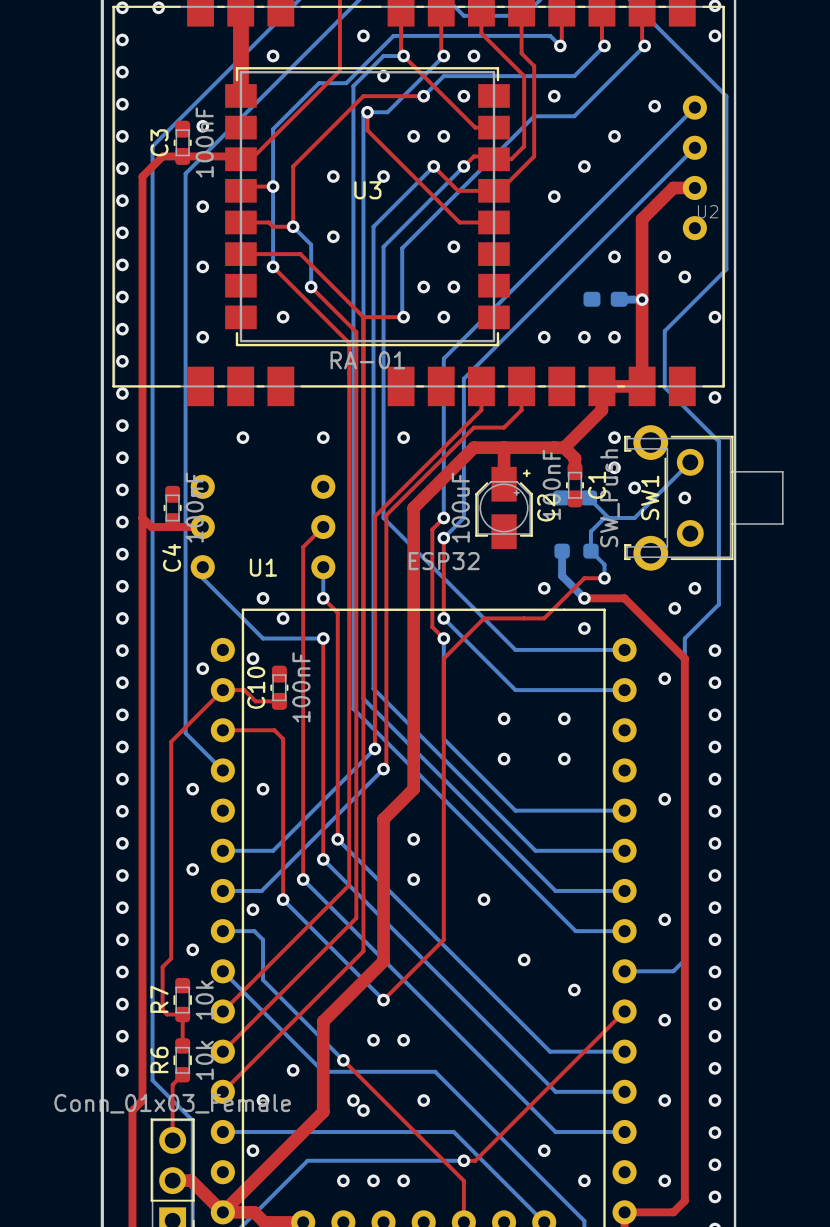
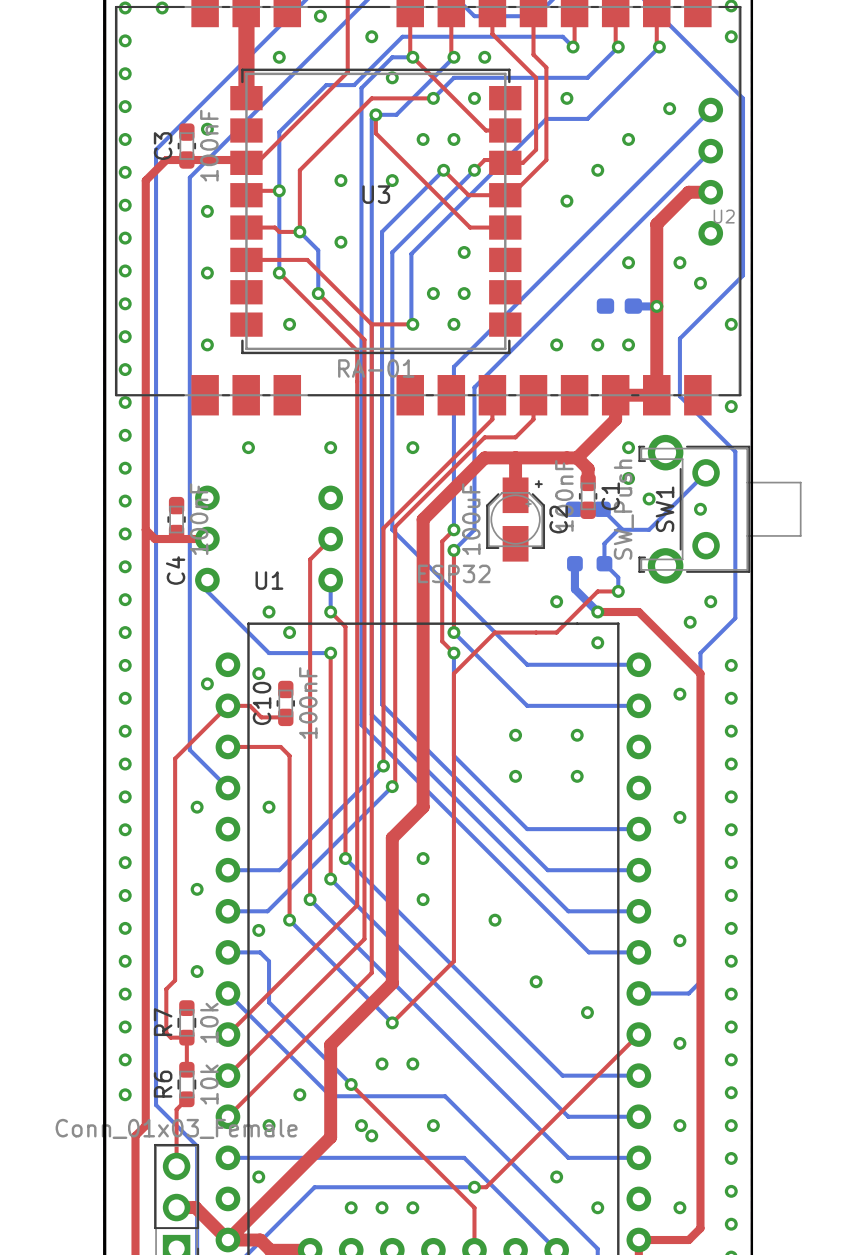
via: none -> (320, 16)

